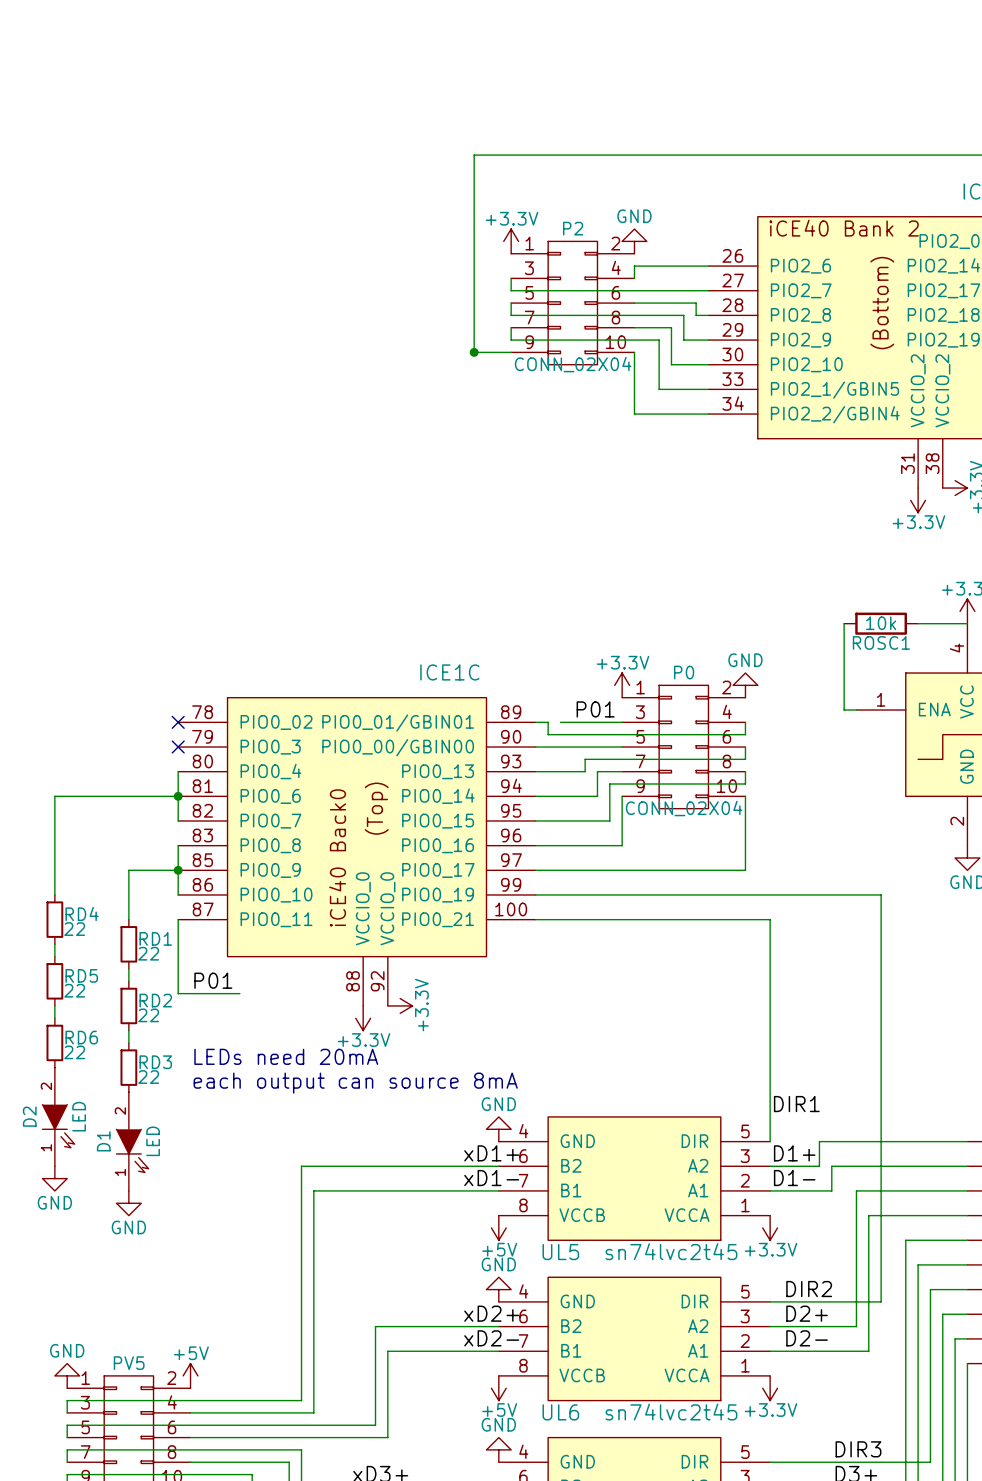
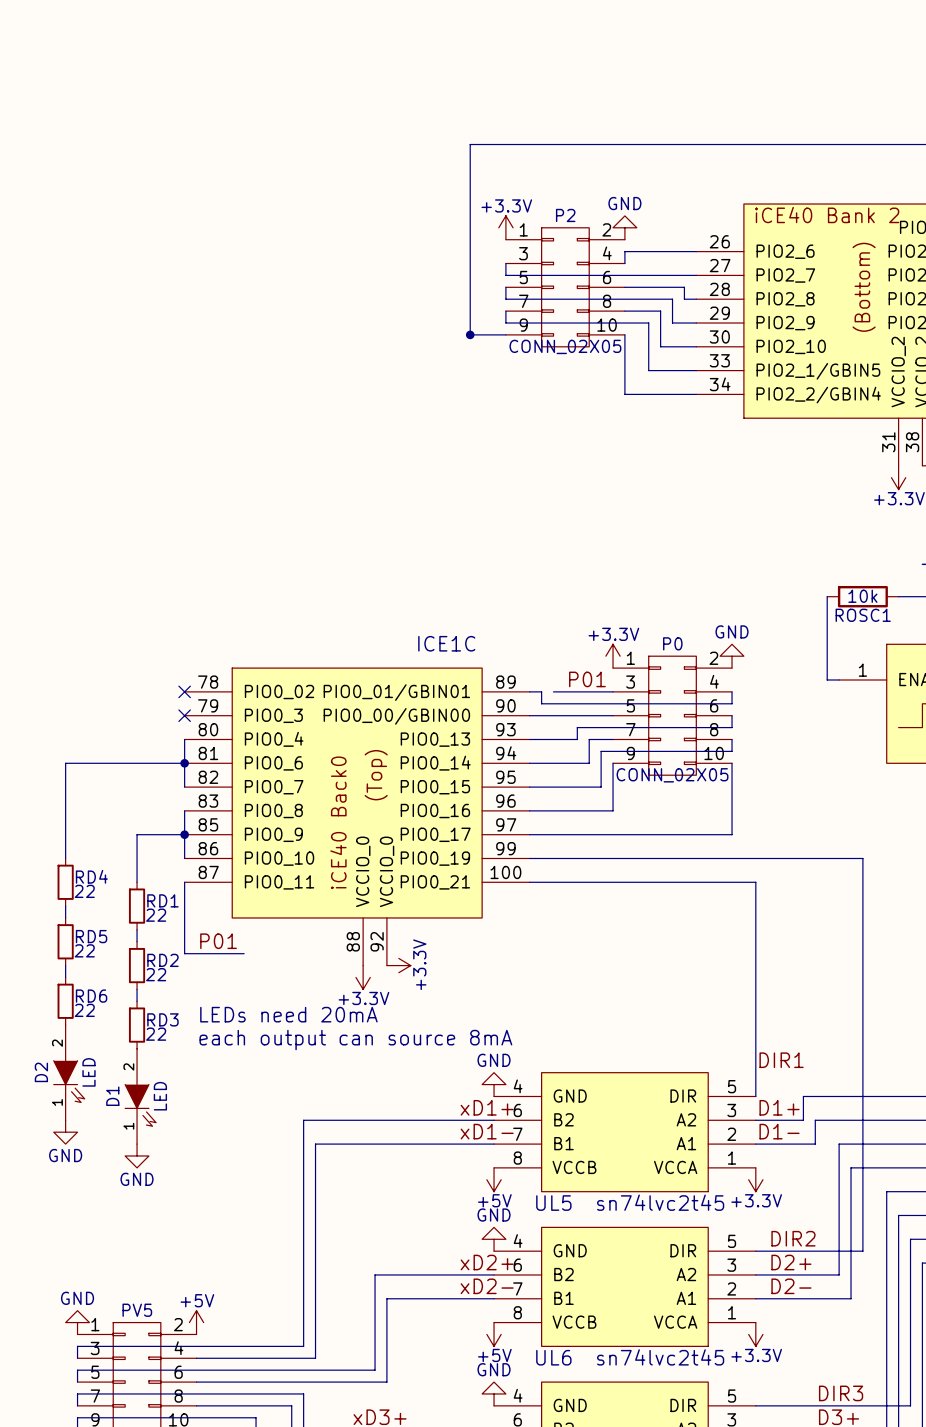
P2 value: CONN_02X04 (573, 364) -> CONN_02X05 (565, 346)
P0 value: CONN_02X04 (684, 808) -> CONN_02X05 (672, 775)

